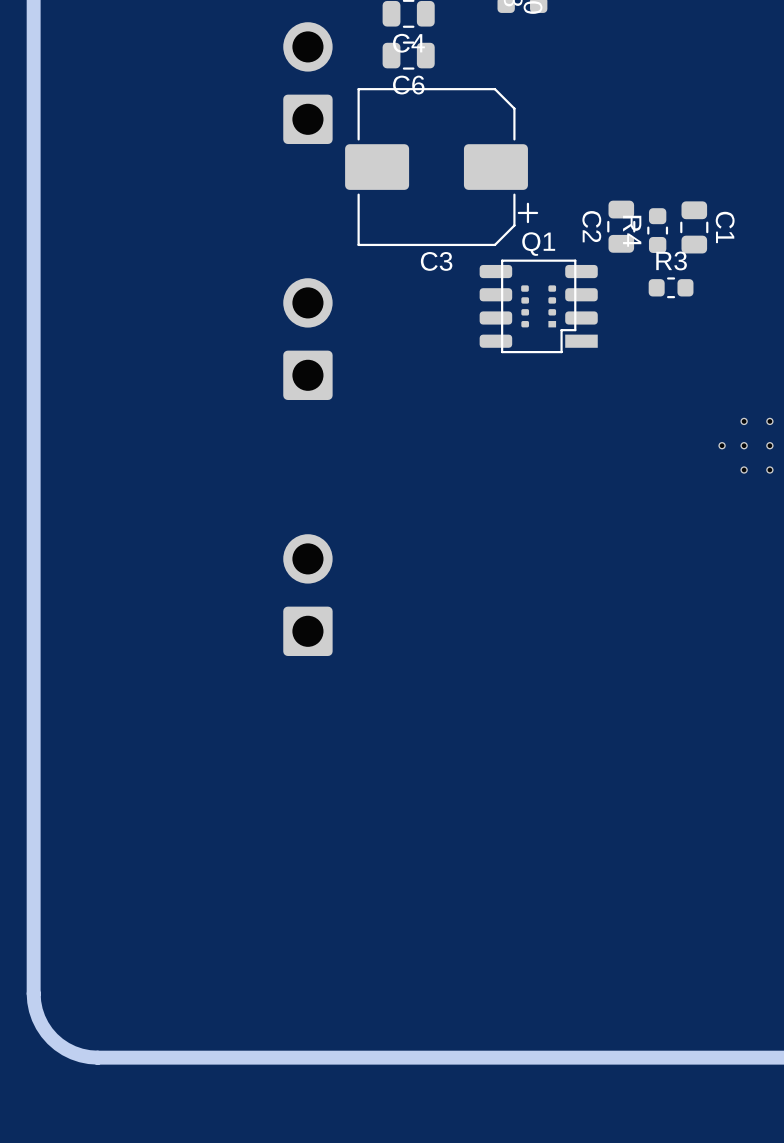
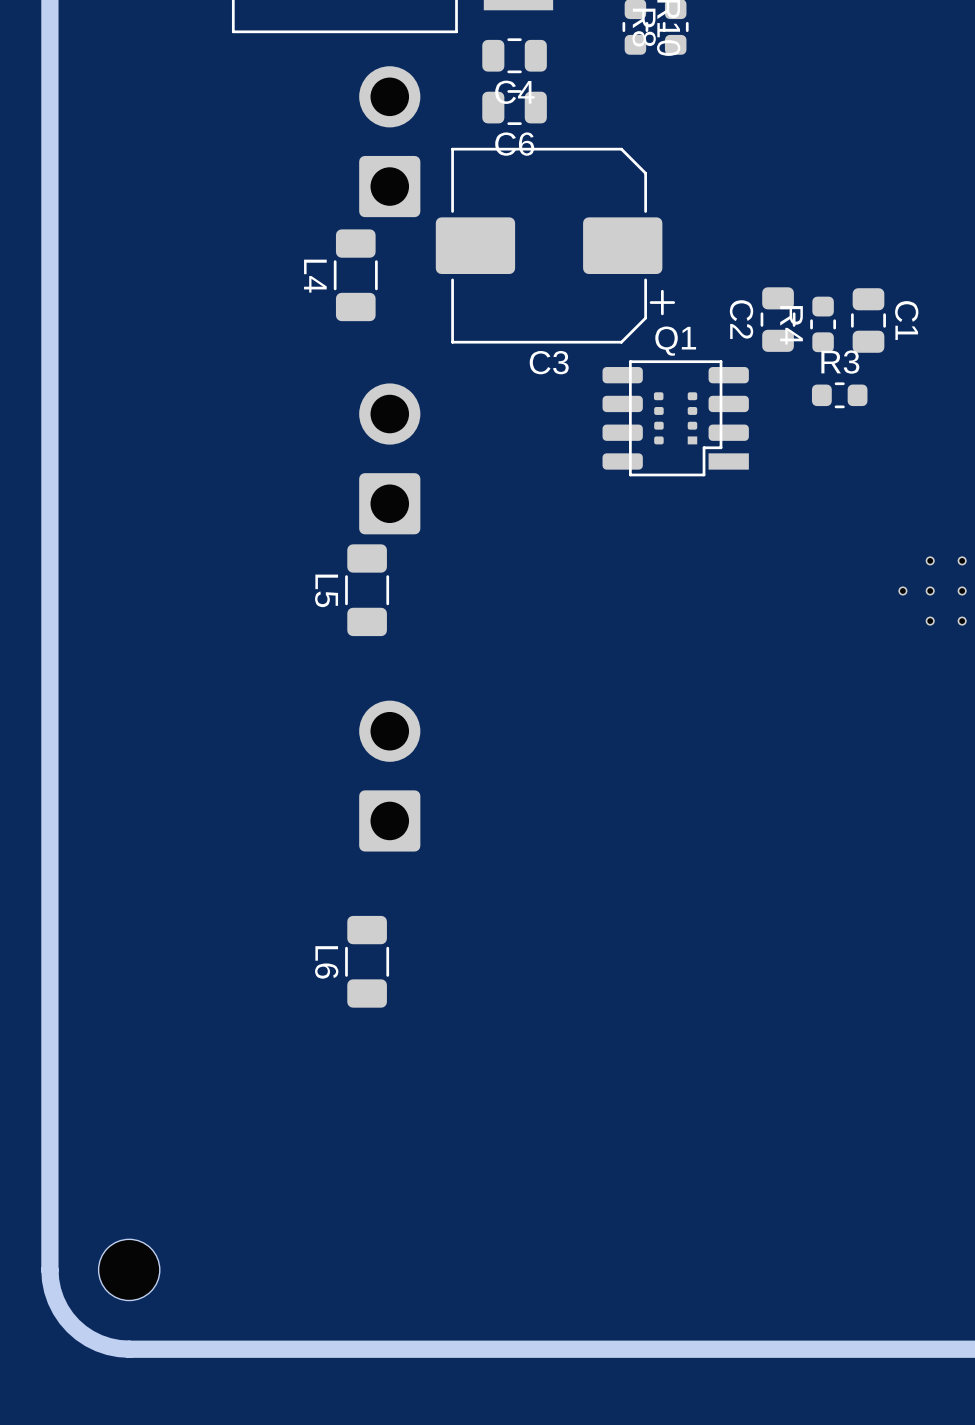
L4: none -> (355, 275)
L5: none -> (367, 590)
L6: none -> (367, 961)
part: none -> (129, 1269)

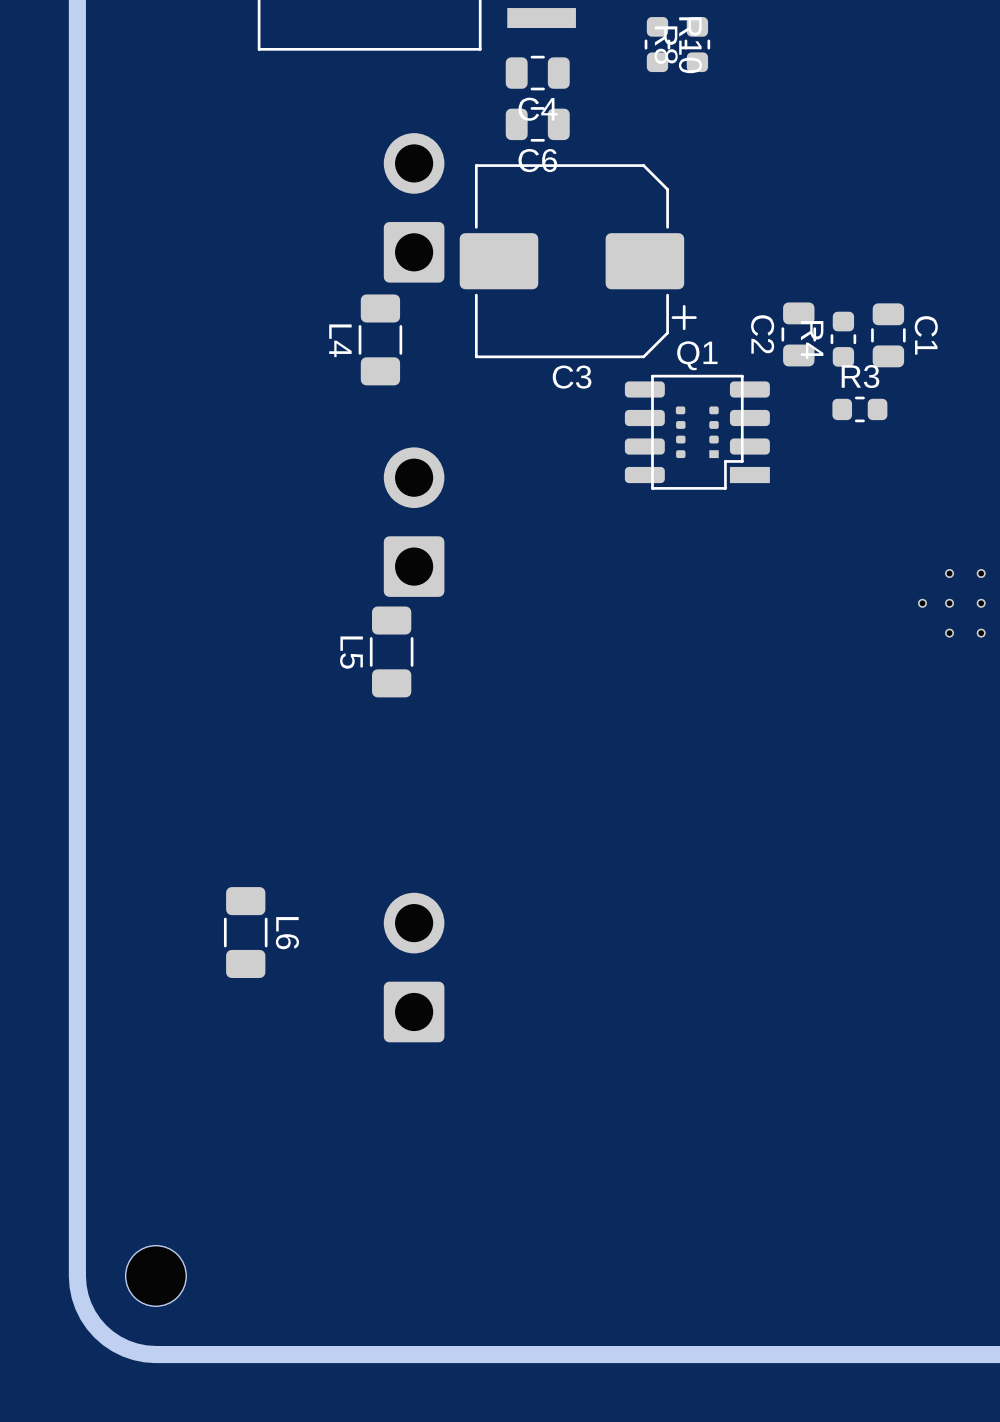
part position: (389, 141) -> (414, 207)
L4 position: (355, 275) -> (380, 339)
part position: (389, 458) -> (414, 522)
L5 position: (367, 590) -> (391, 651)
part: (389, 776) -> none
part: none -> (414, 967)
L6 position: (367, 961) -> (245, 932)
L6 name position: L6 (326, 962) -> L6 (287, 933)

